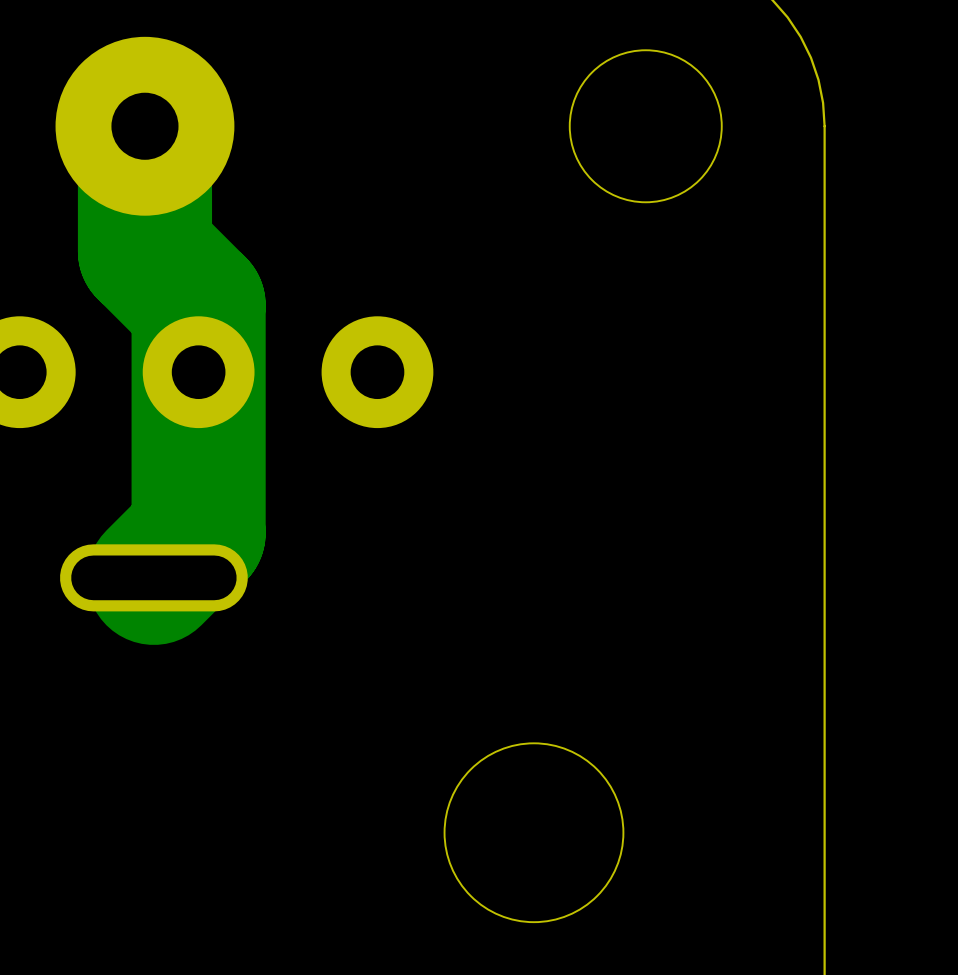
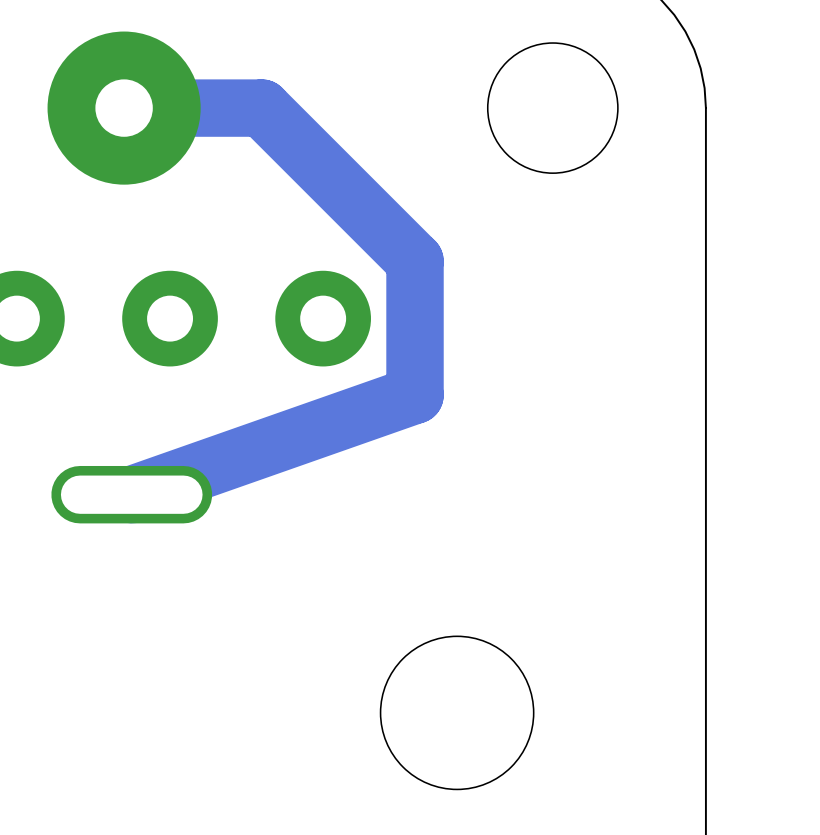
track: (144, 126) (144, 251) (198, 305) (198, 533) (153, 577) -> (124, 108) (261, 108) (415, 261) (415, 395) (131, 494)

